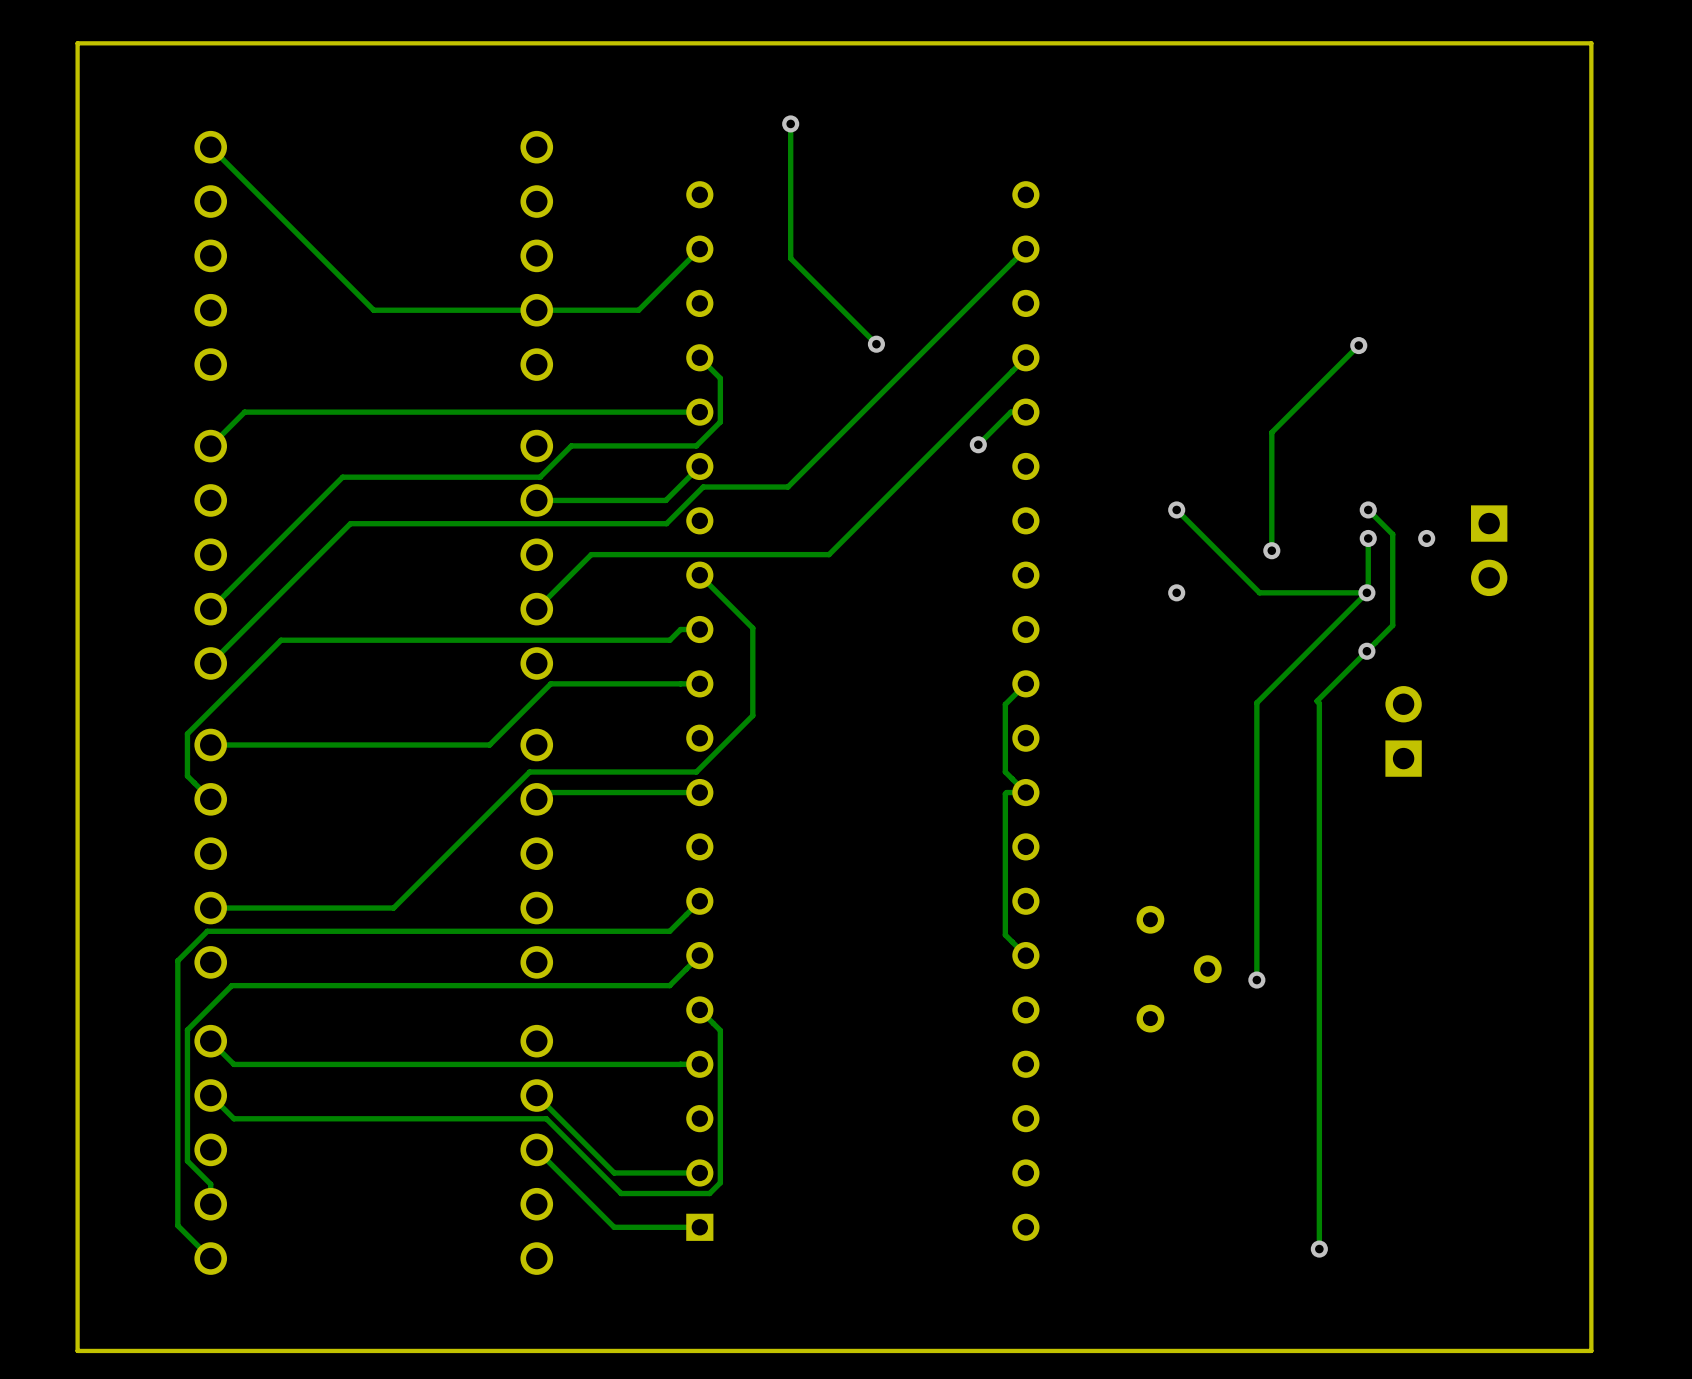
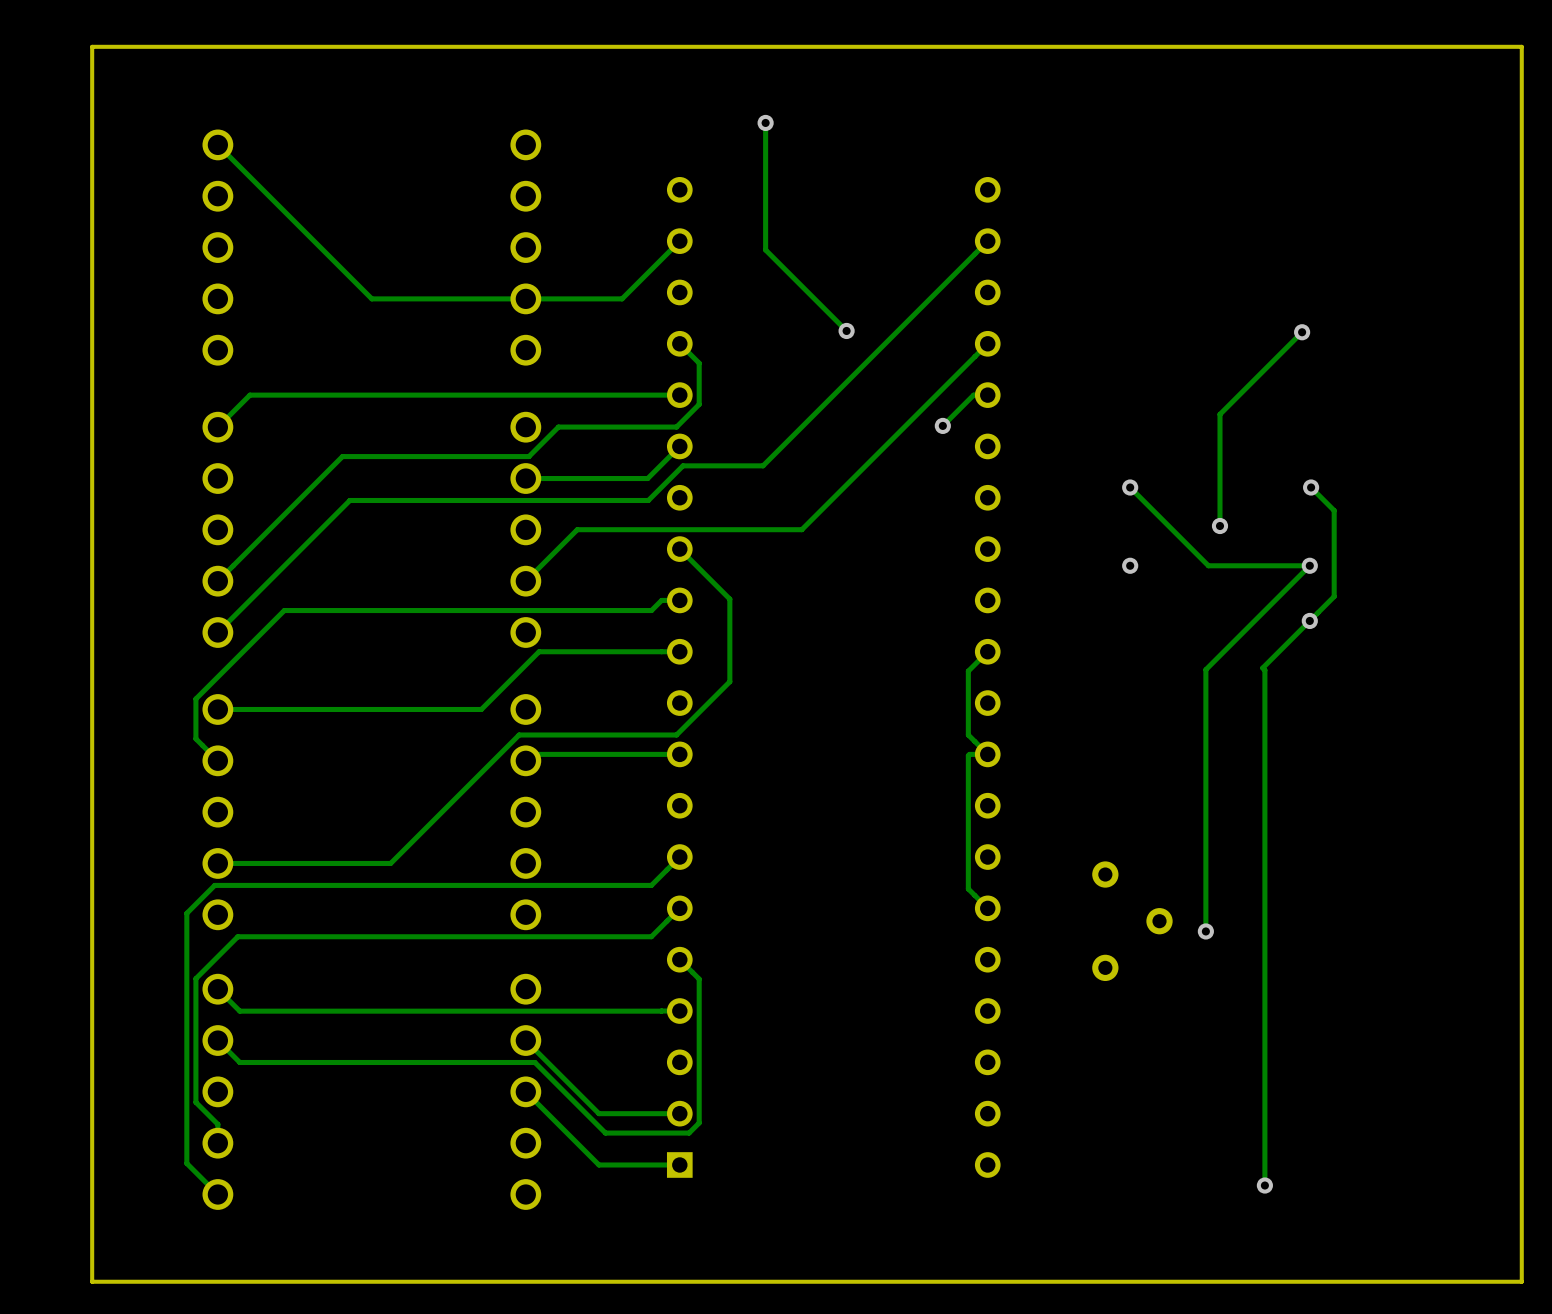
track: (1368, 538) (1366, 592) -> none
via: (1368, 538) -> none
via: (1426, 538) -> none
part: (1489, 550) -> none
part: (1403, 731) -> none

